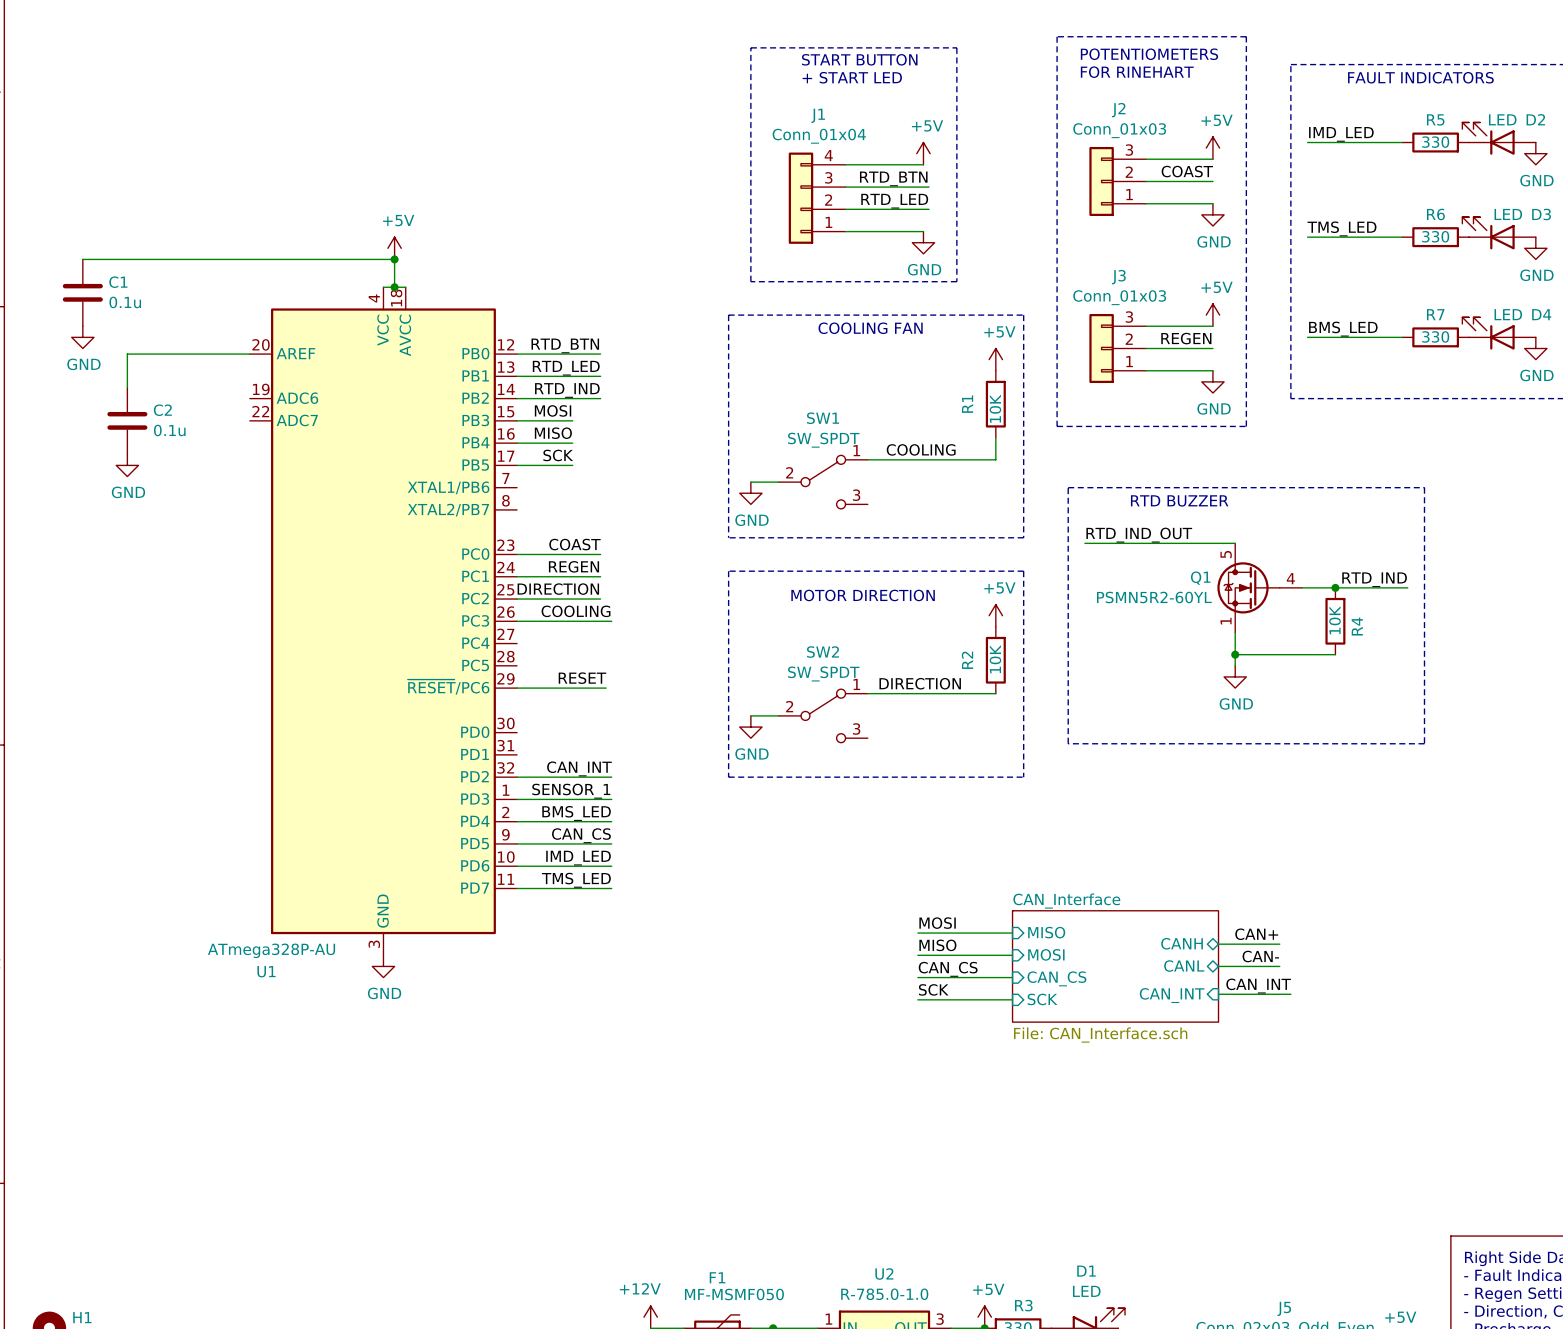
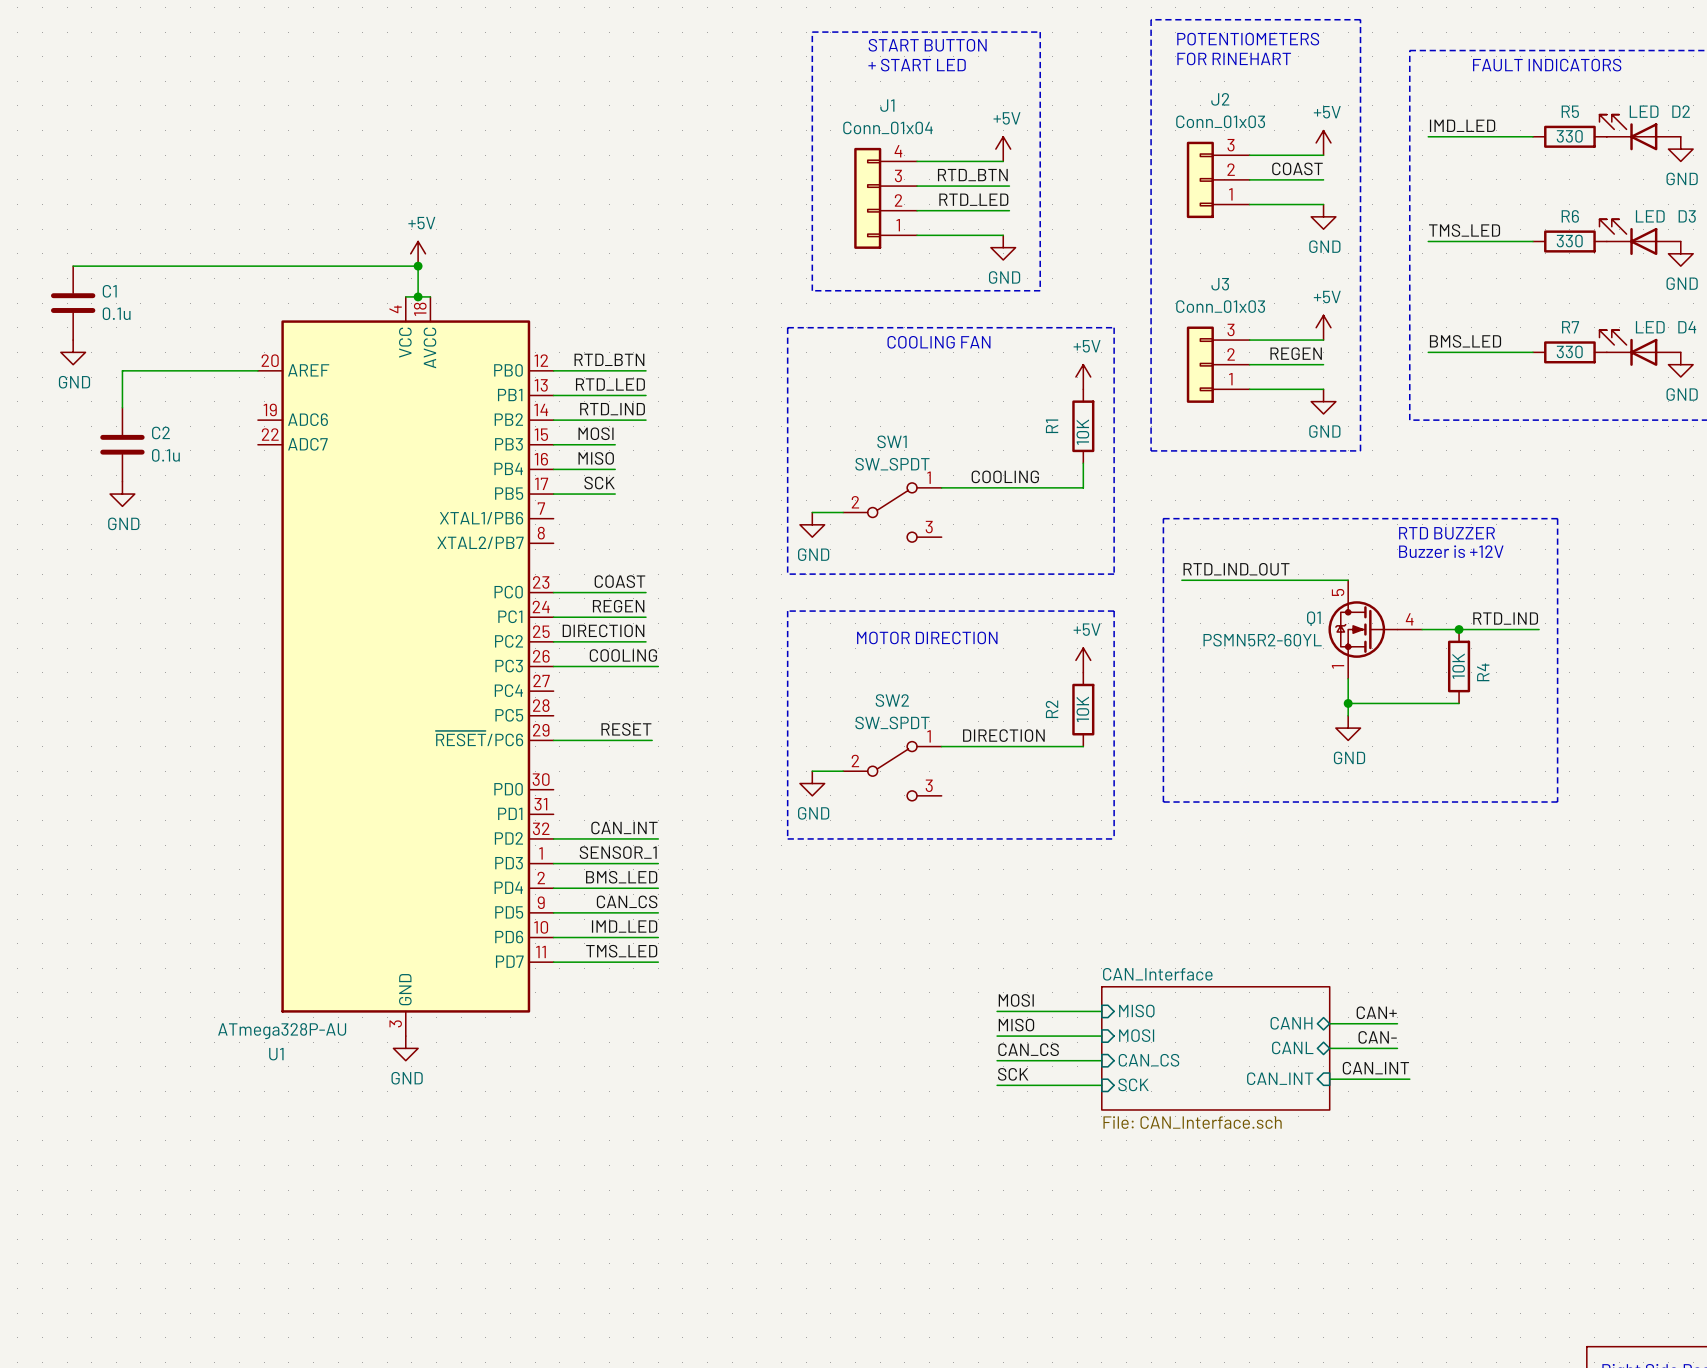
text position: RTD BUZZER (1179, 500) -> RTD BUZZER (1447, 533)
text: none -> Buzzer is +12V (1451, 551)

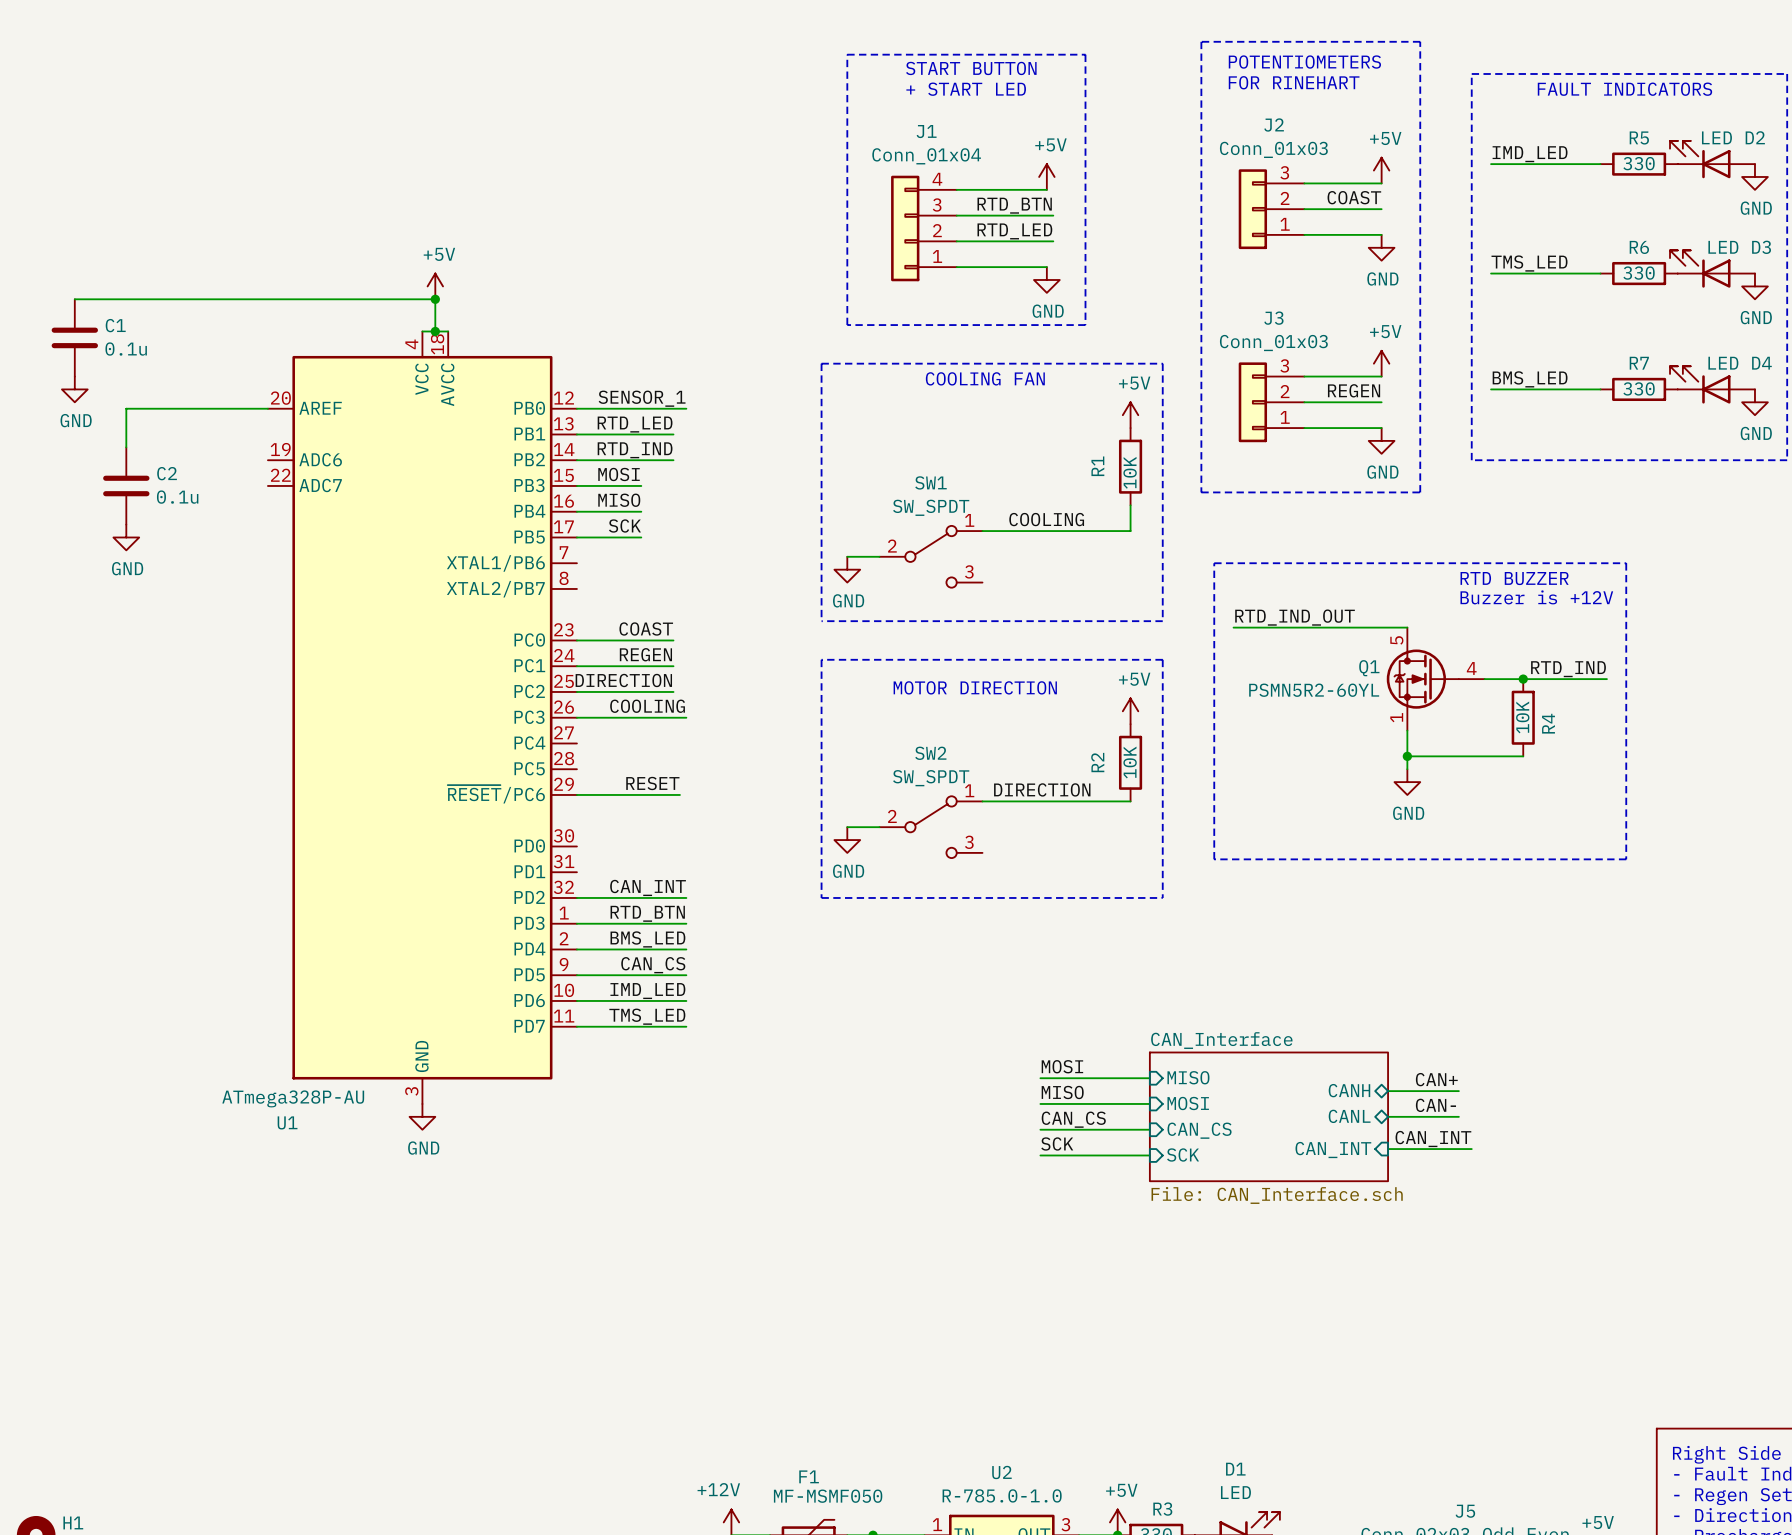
label: RTD_BTN (609, 359) -> none
label: none -> SENSOR_1 (642, 398)
wire: none -> (673, 408) (686, 408)
label: SENSOR_1 (618, 852) -> RTD_BTN (647, 913)

